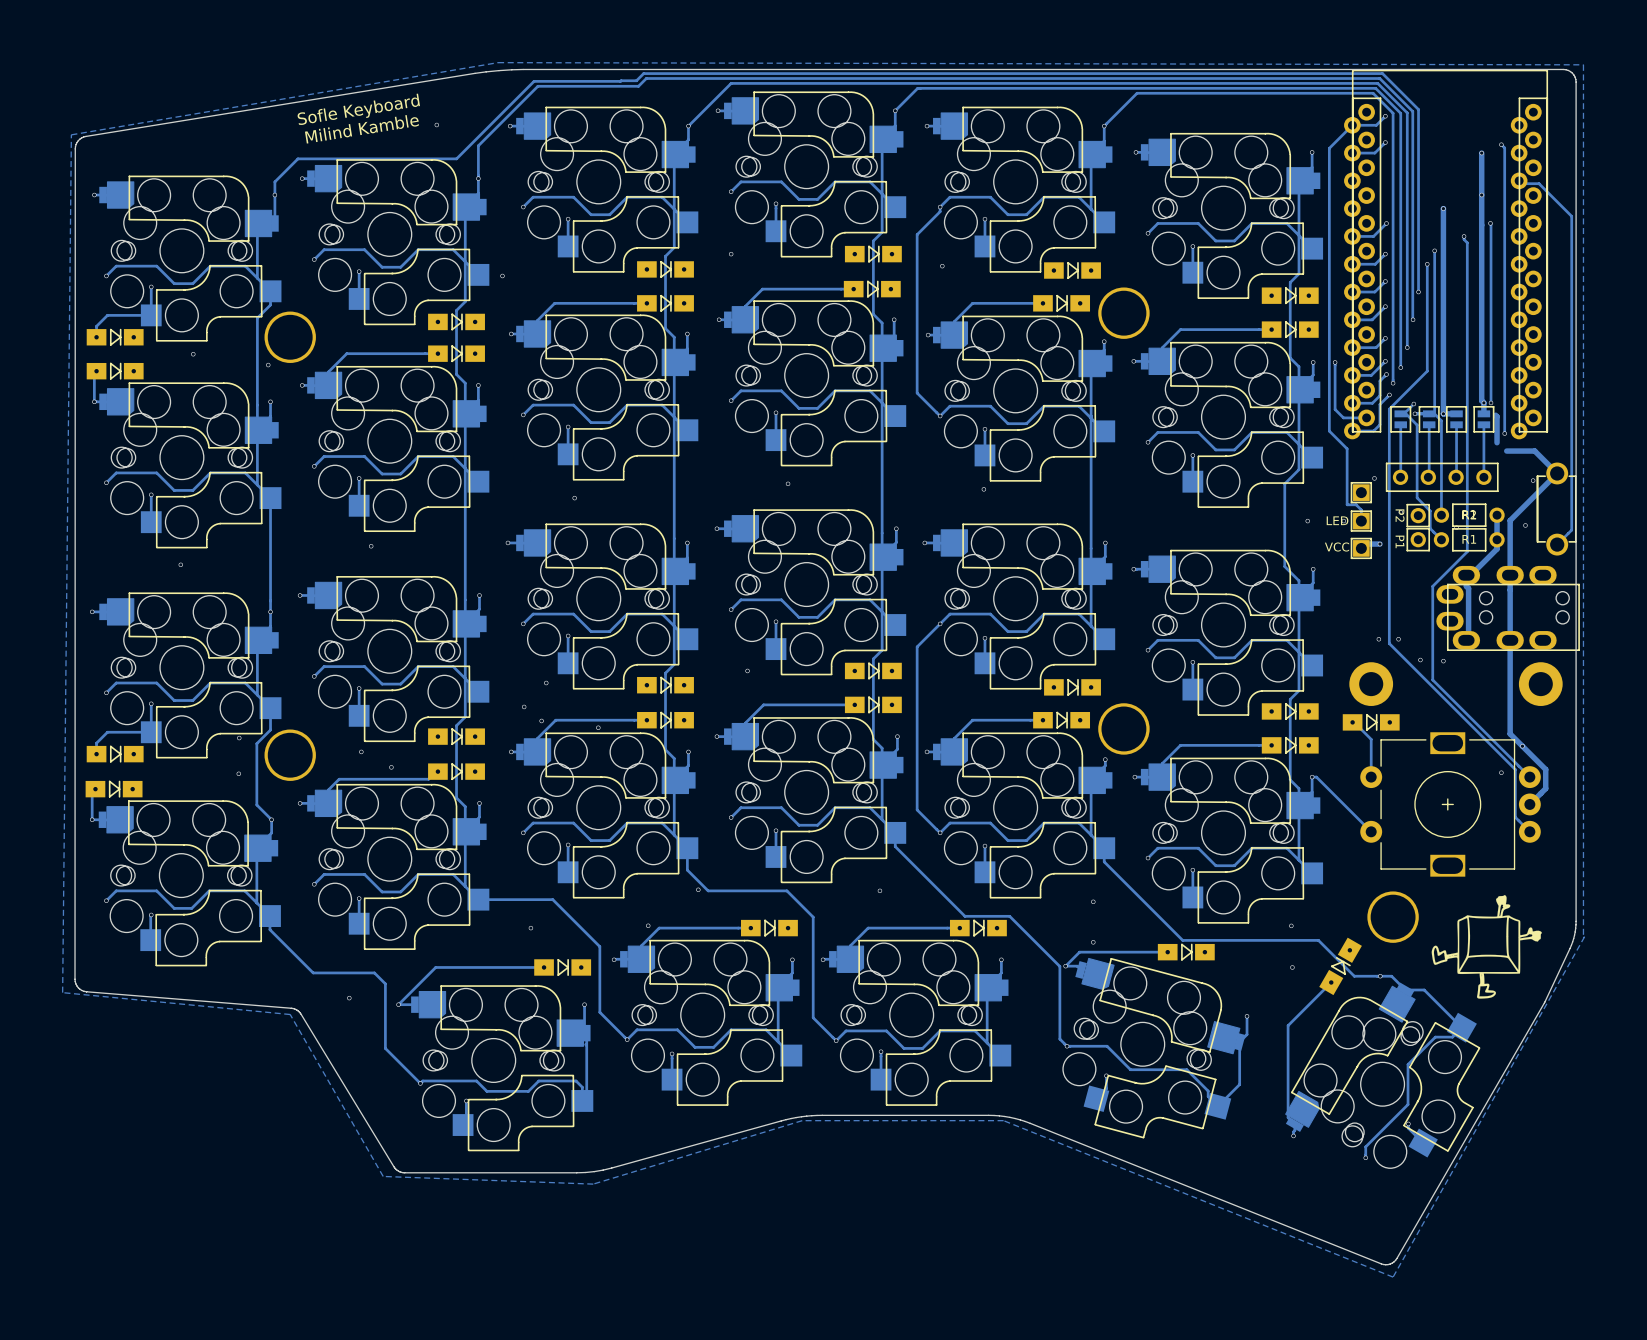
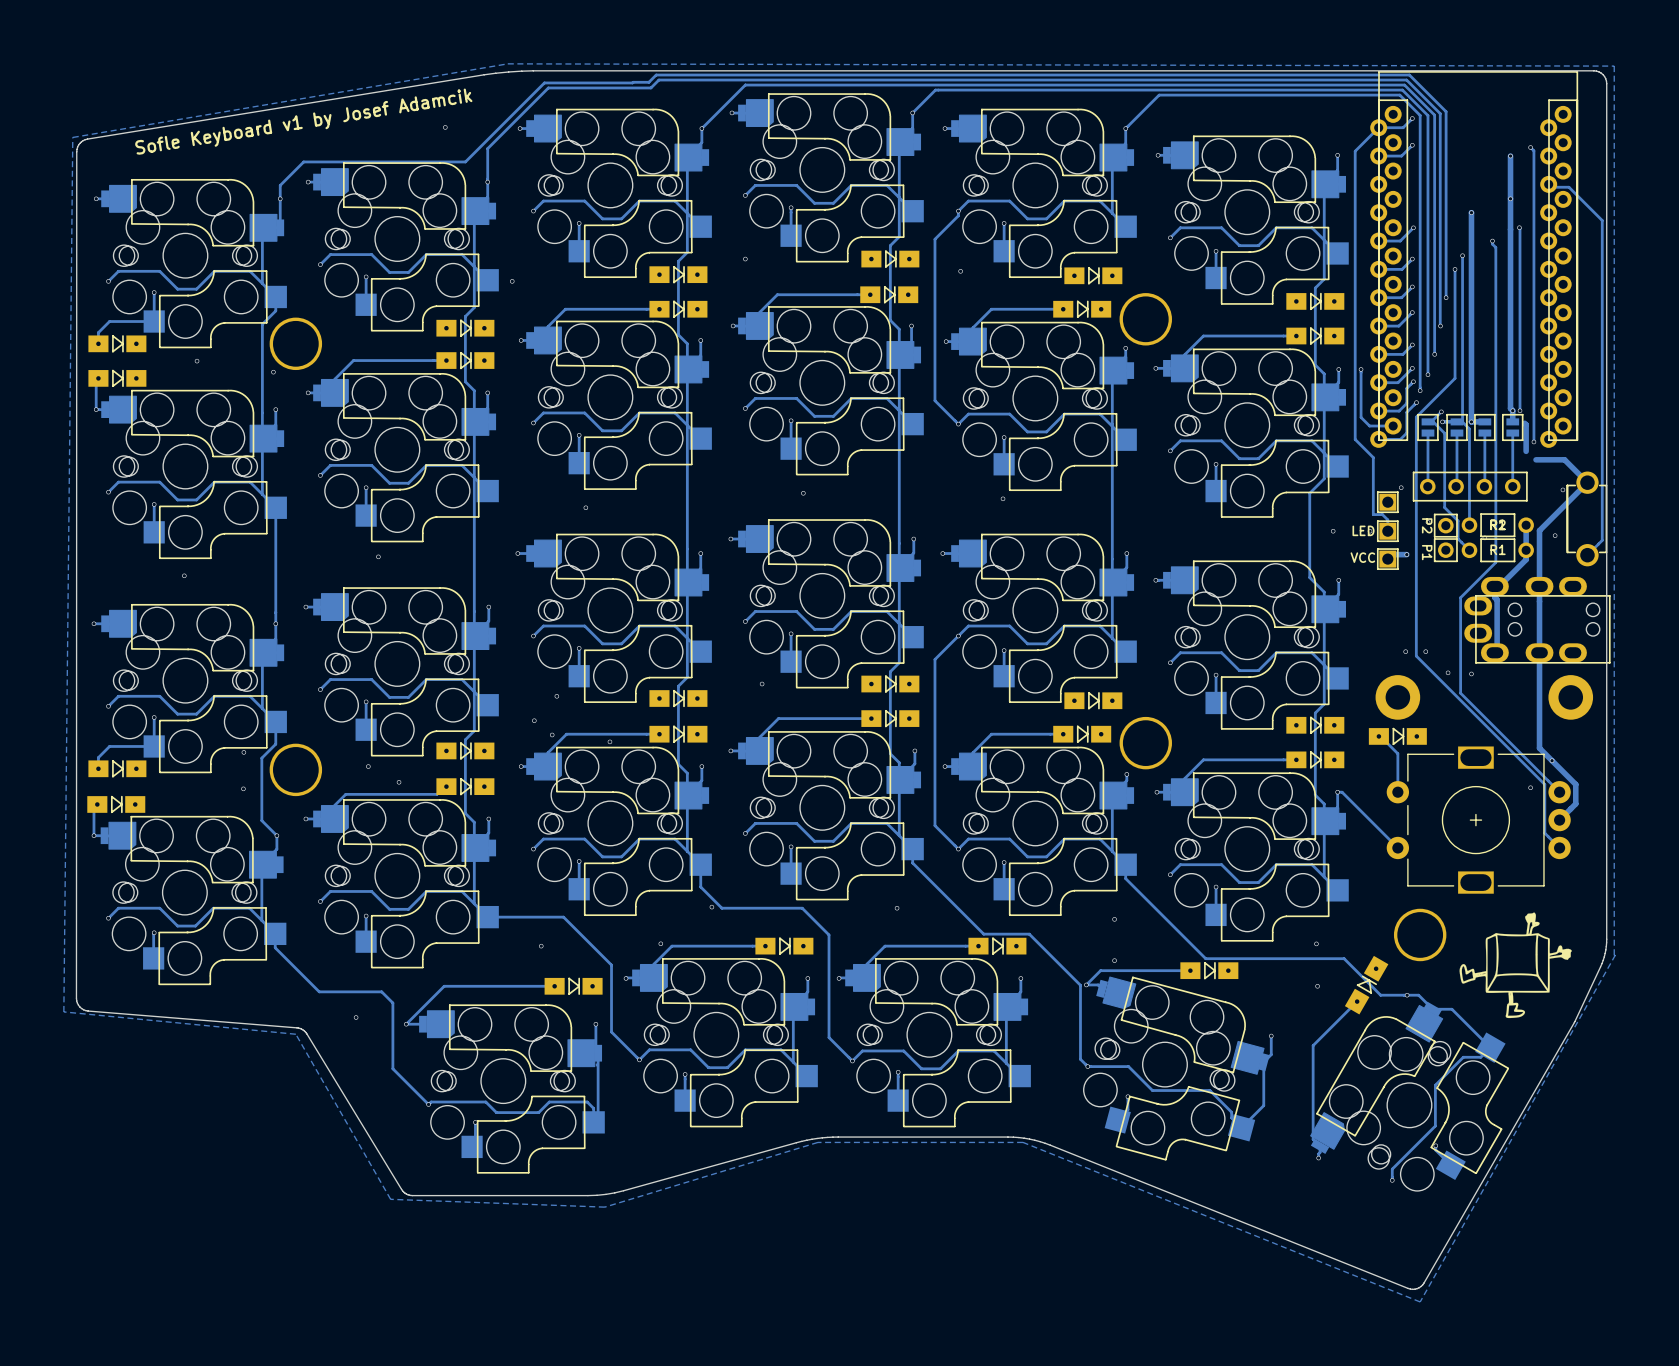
text: Sofle Keyboard (358, 109) -> none
text: none -> Sofle Keyboard v1 by Josef Adamcik (303, 121)
text: Milind Kamble (361, 129) -> none

